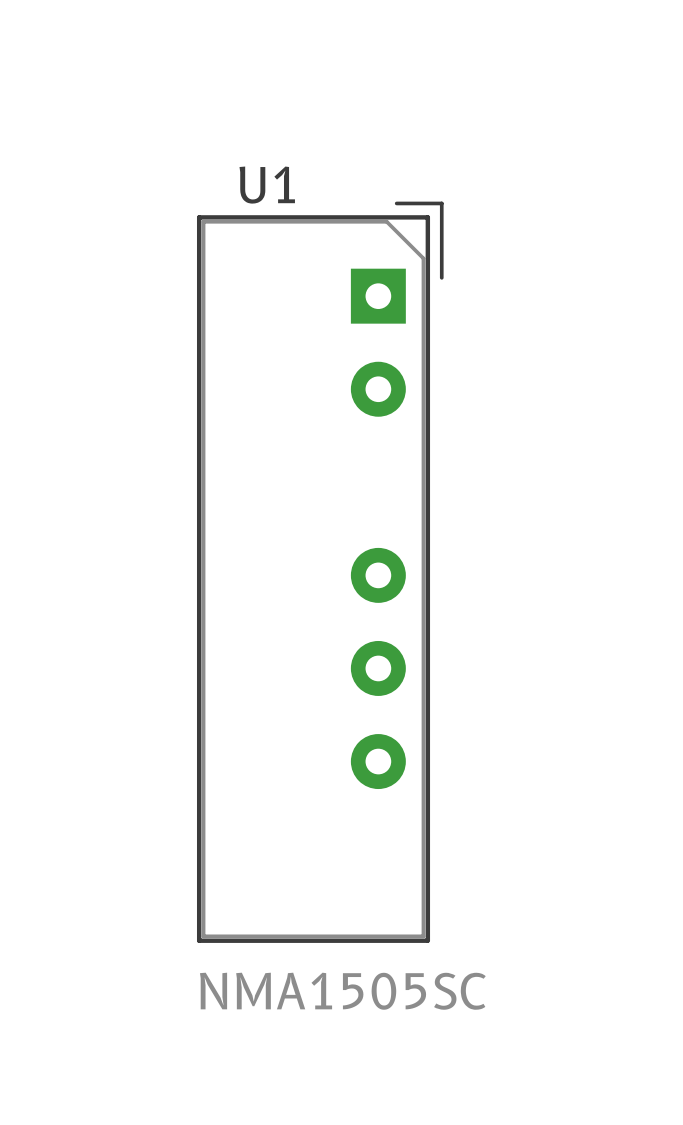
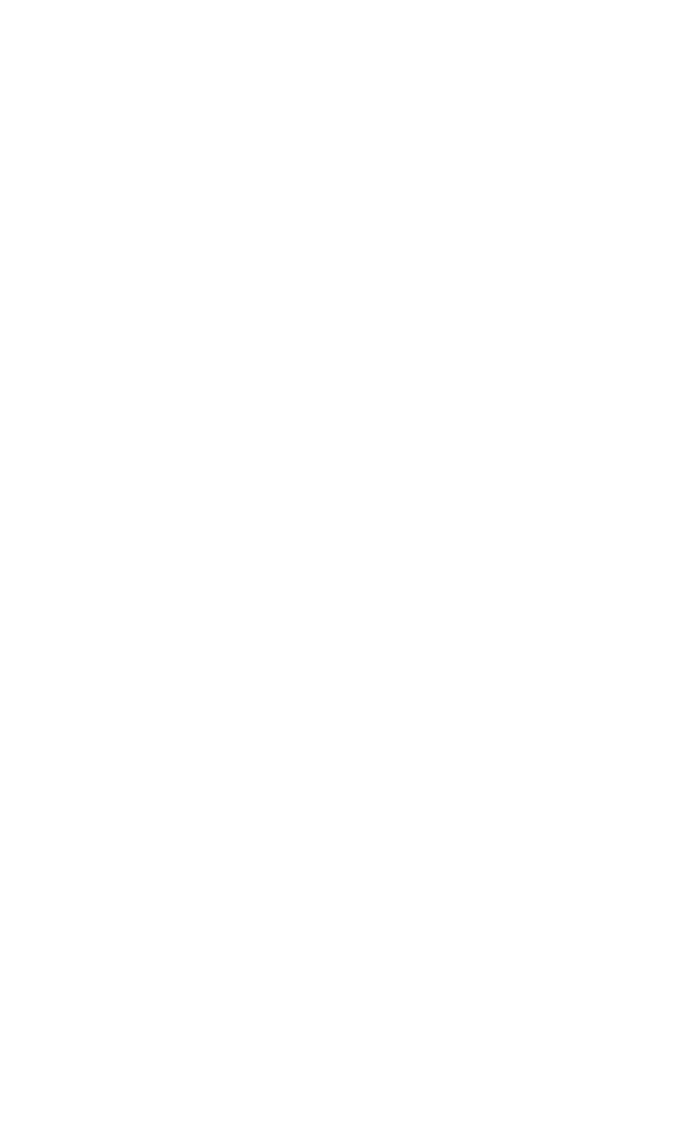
U1: NMA1505SC (320, 572) -> none

